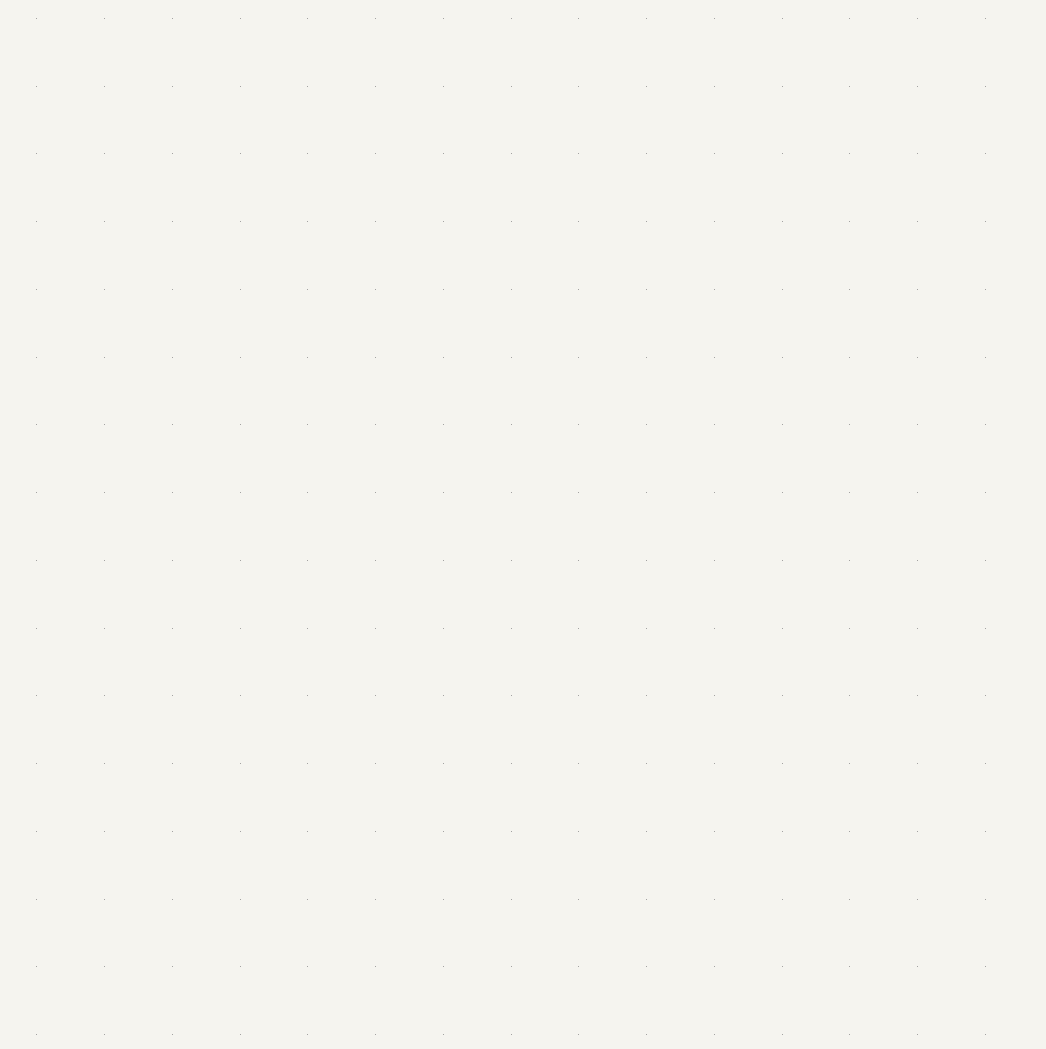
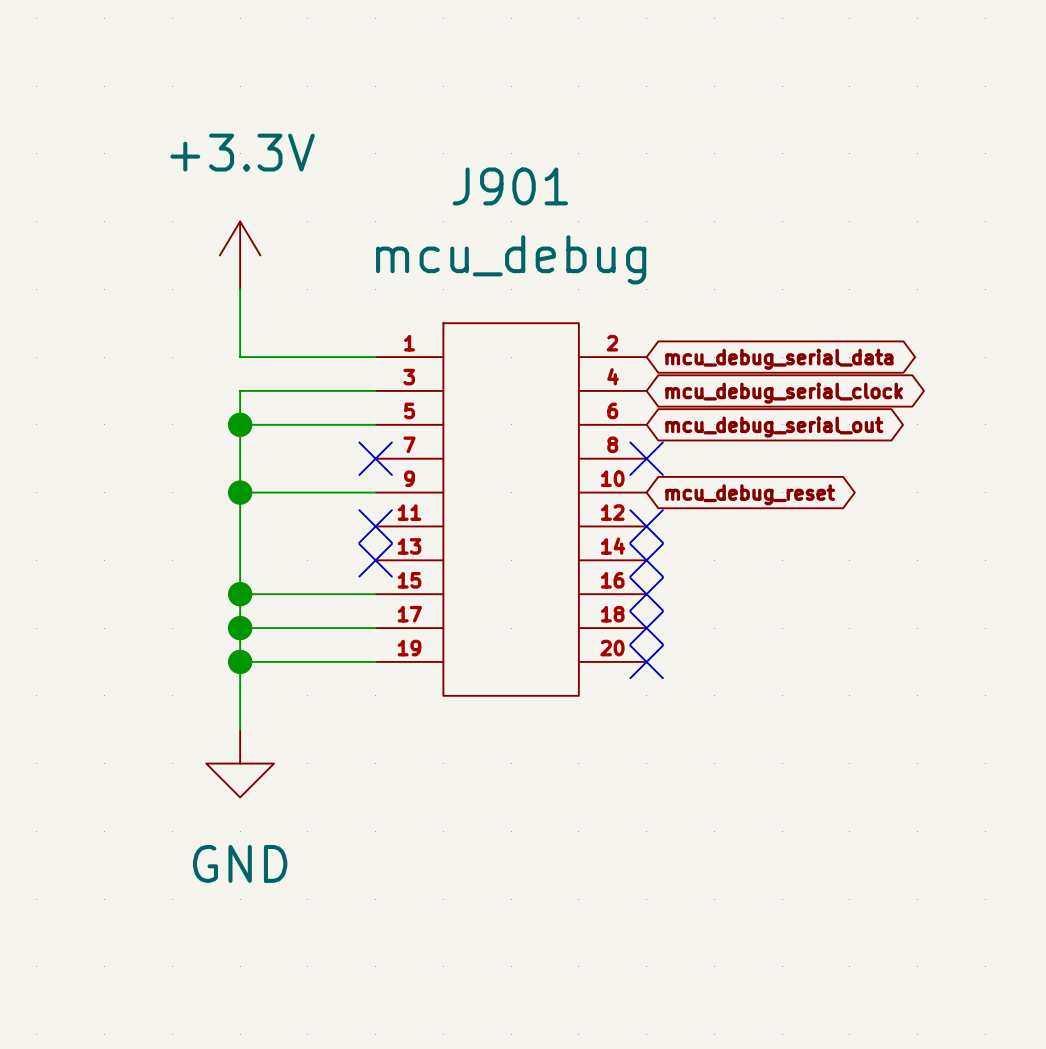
power symbol: none -> +3.3V (240, 255)
wire: none -> (240, 289) (240, 357) (375, 357)
global label: none -> mcu_debug_serial_data (779, 359)
wire: none -> (375, 390) (240, 390) (240, 729)
global label: none -> mcu_debug_serial_clock (784, 393)
wire: none -> (240, 424) (375, 424)
junction: none -> (240, 424)
global label: none -> mcu_debug_serial_out (774, 427)
no-connect mark: none -> (375, 458)
no-connect mark: none -> (646, 458)
wire: none -> (240, 492) (375, 492)
junction: none -> (240, 492)
global label: none -> mcu_debug_reset (750, 494)
J901: none -> mcu_debug (511, 509)
no-connect mark: none -> (375, 526)
no-connect mark: none -> (646, 526)
no-connect mark: none -> (375, 560)
no-connect mark: none -> (646, 560)
wire: none -> (240, 594) (375, 594)
junction: none -> (240, 594)
no-connect mark: none -> (646, 594)
wire: none -> (240, 628) (375, 628)
junction: none -> (240, 628)
no-connect mark: none -> (646, 628)
wire: none -> (240, 661) (375, 661)
junction: none -> (240, 661)
no-connect mark: none -> (646, 661)
power symbol: none -> GND (240, 763)

